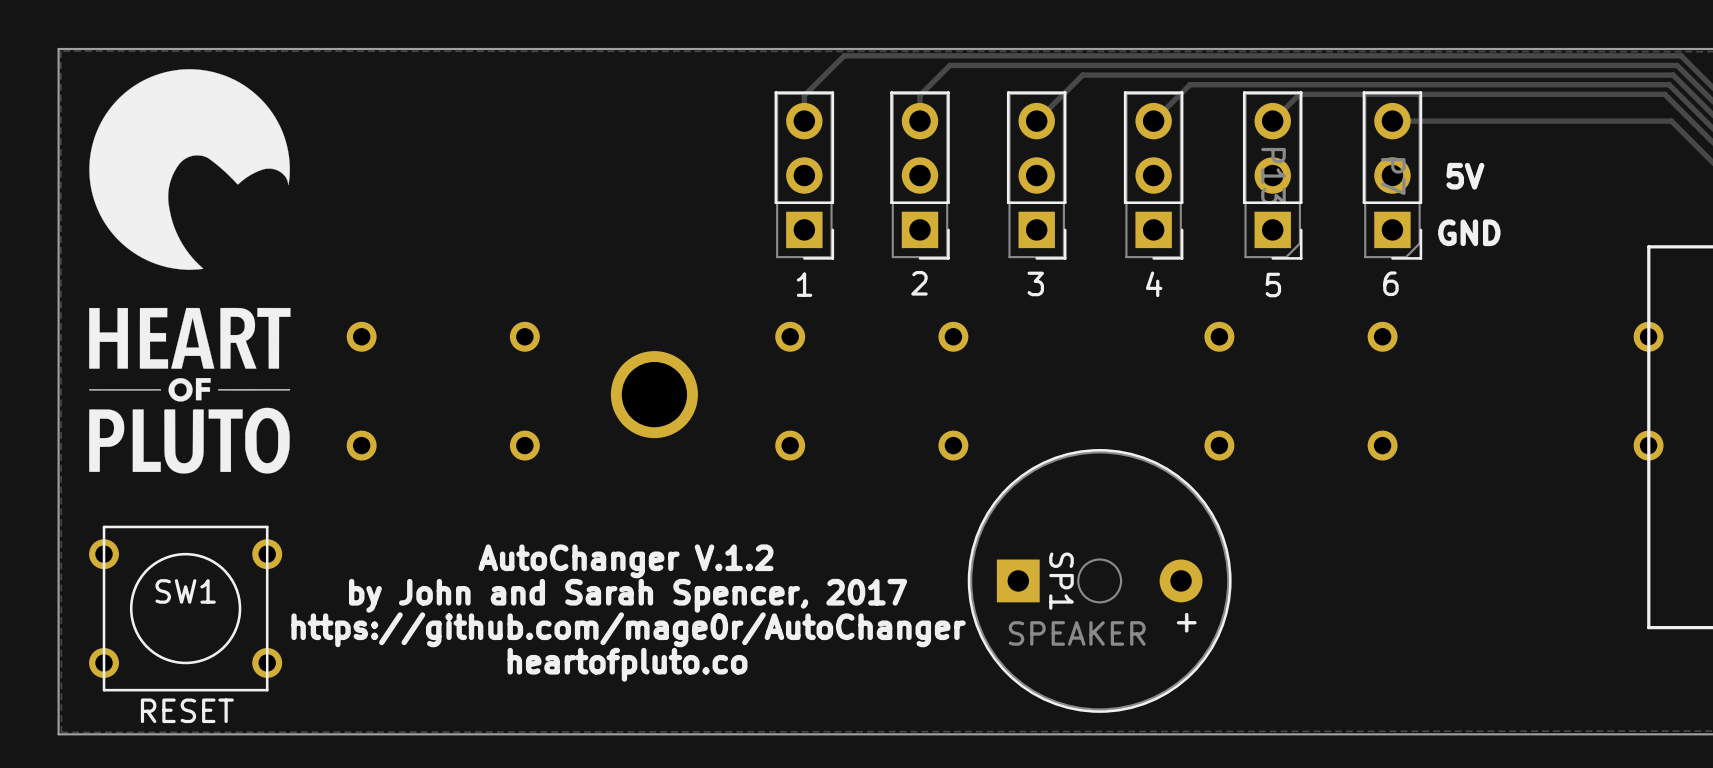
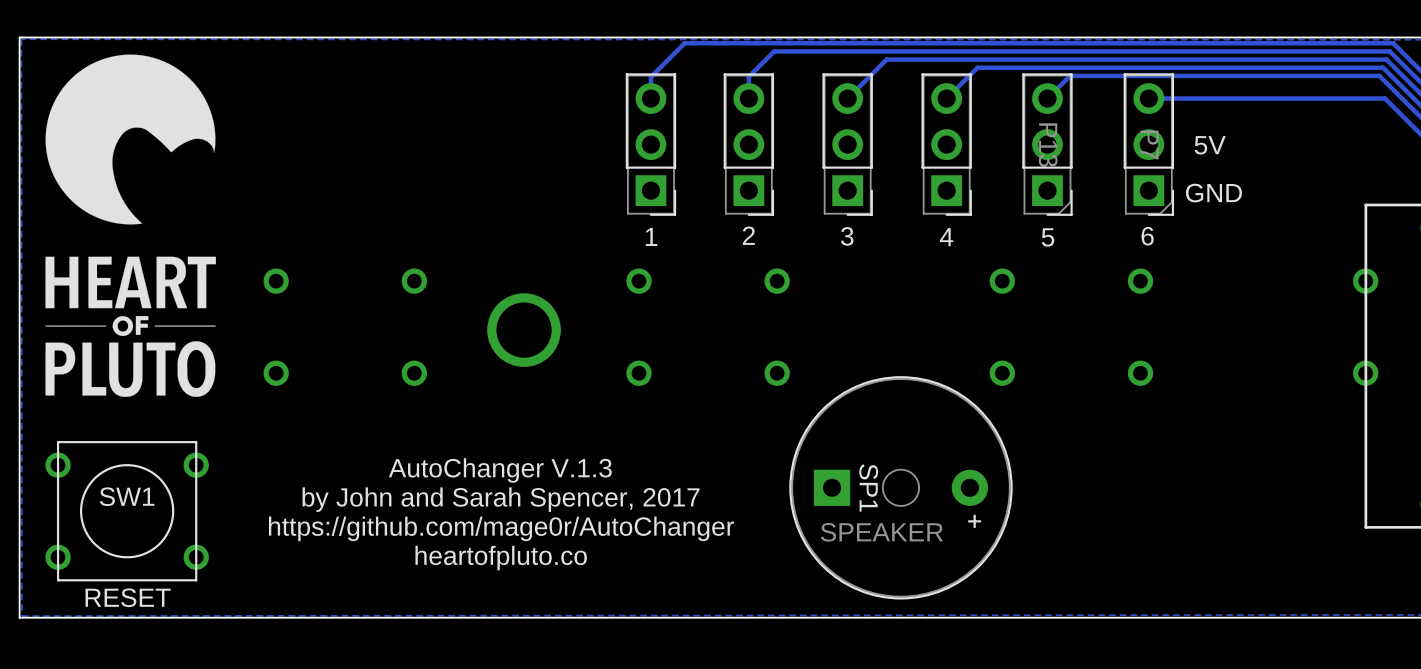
text: AutoChanger V.1.2 (625, 561) -> AutoChanger V.1.3 (500, 470)

